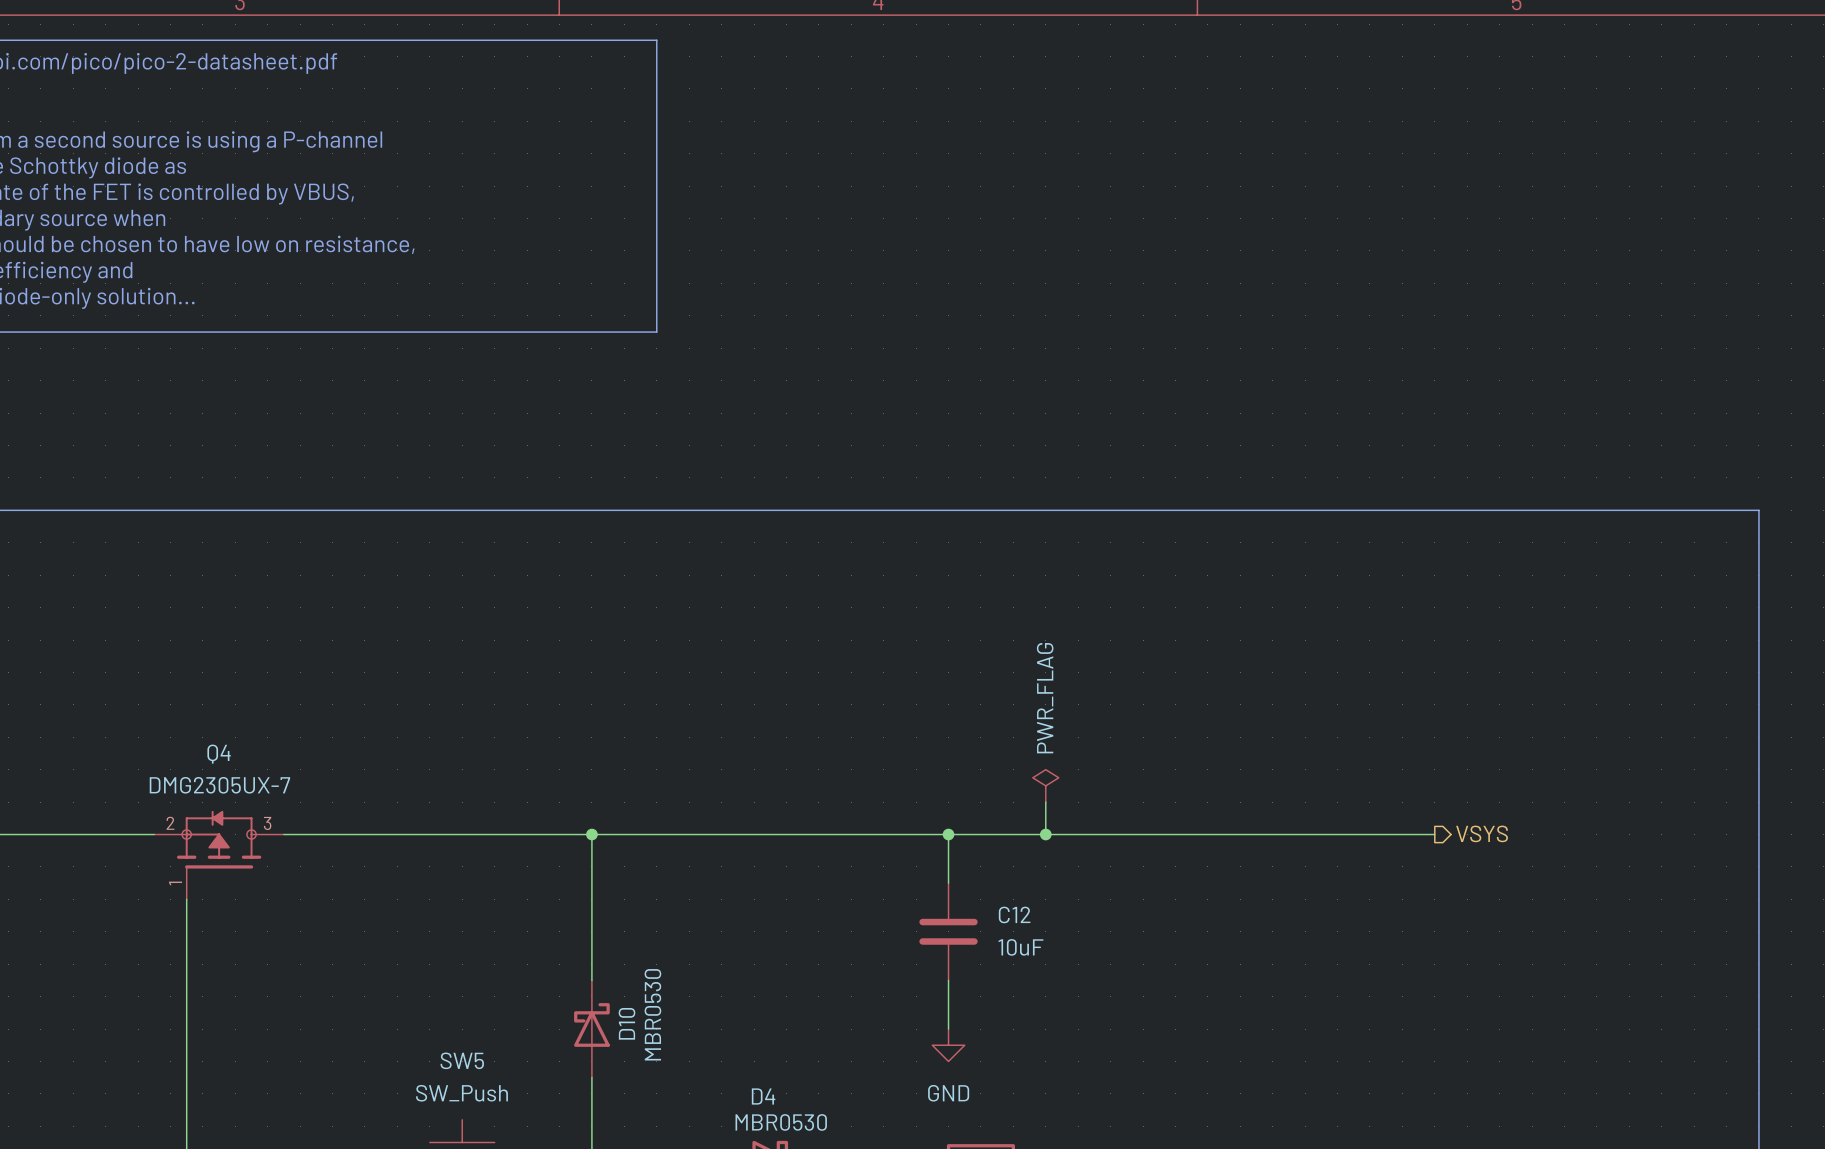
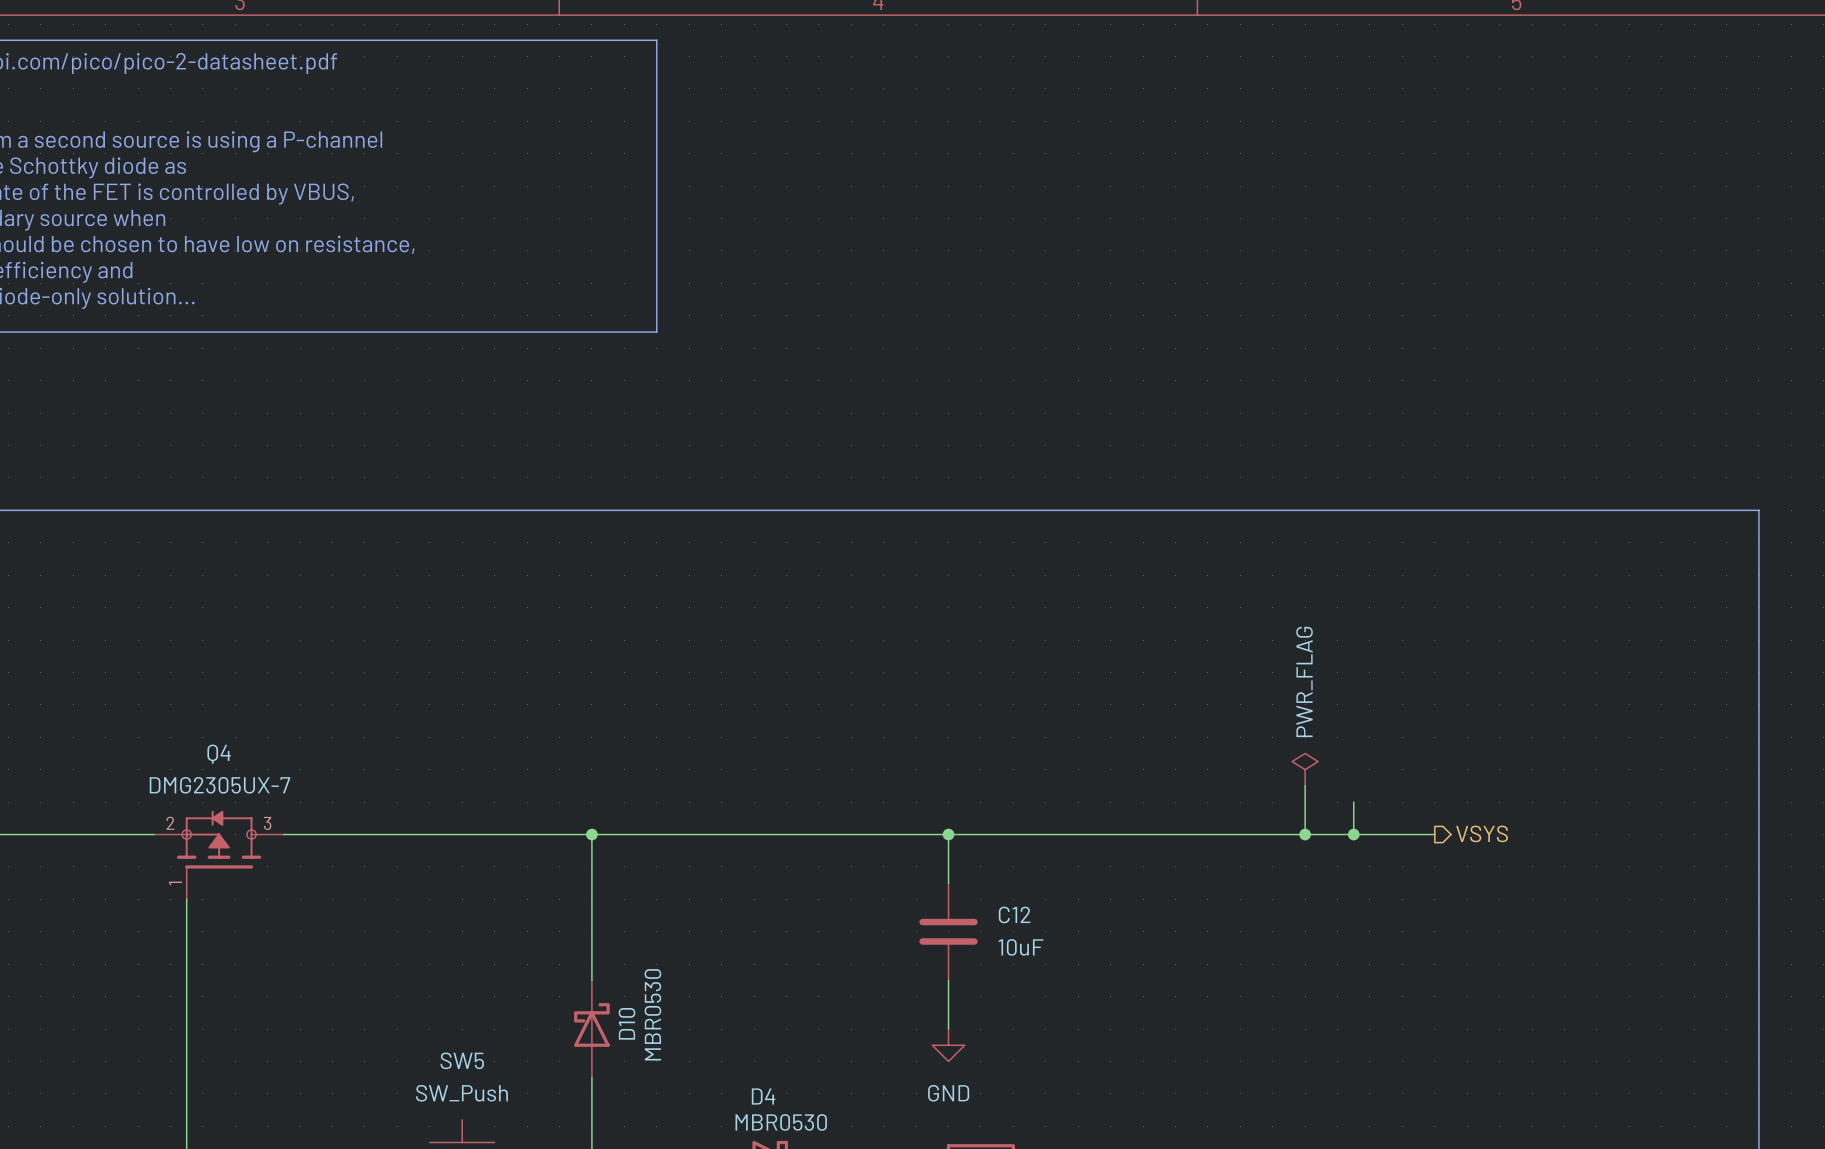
power symbol position: PWR_FLAG (1045, 785) -> PWR_FLAG (1305, 769)
wire: none -> (1305, 785) (1305, 834)
wire: (1045, 802) (1045, 834) -> (1353, 802) (1353, 834)
junction: (1045, 834) -> none
junction: none -> (1305, 834)
junction: none -> (1353, 834)

